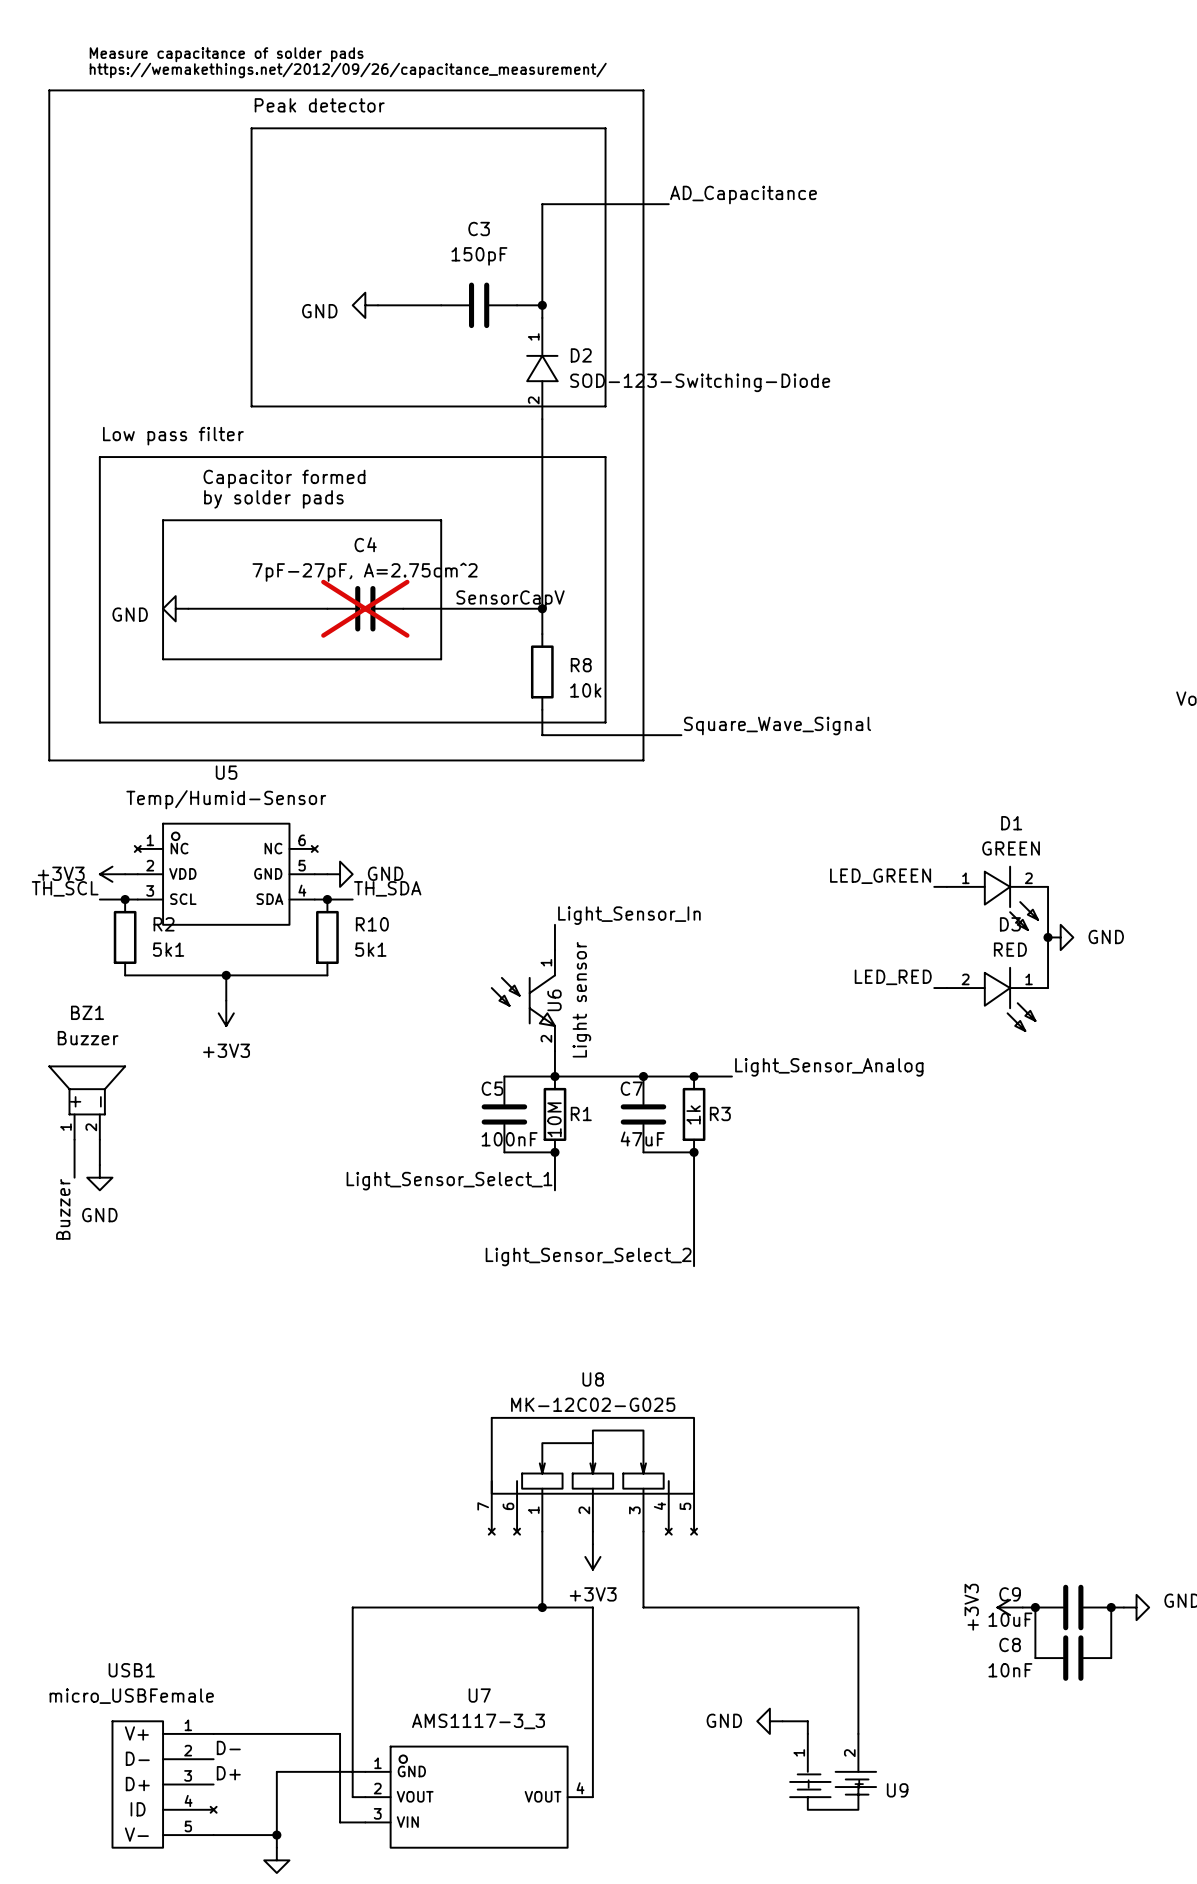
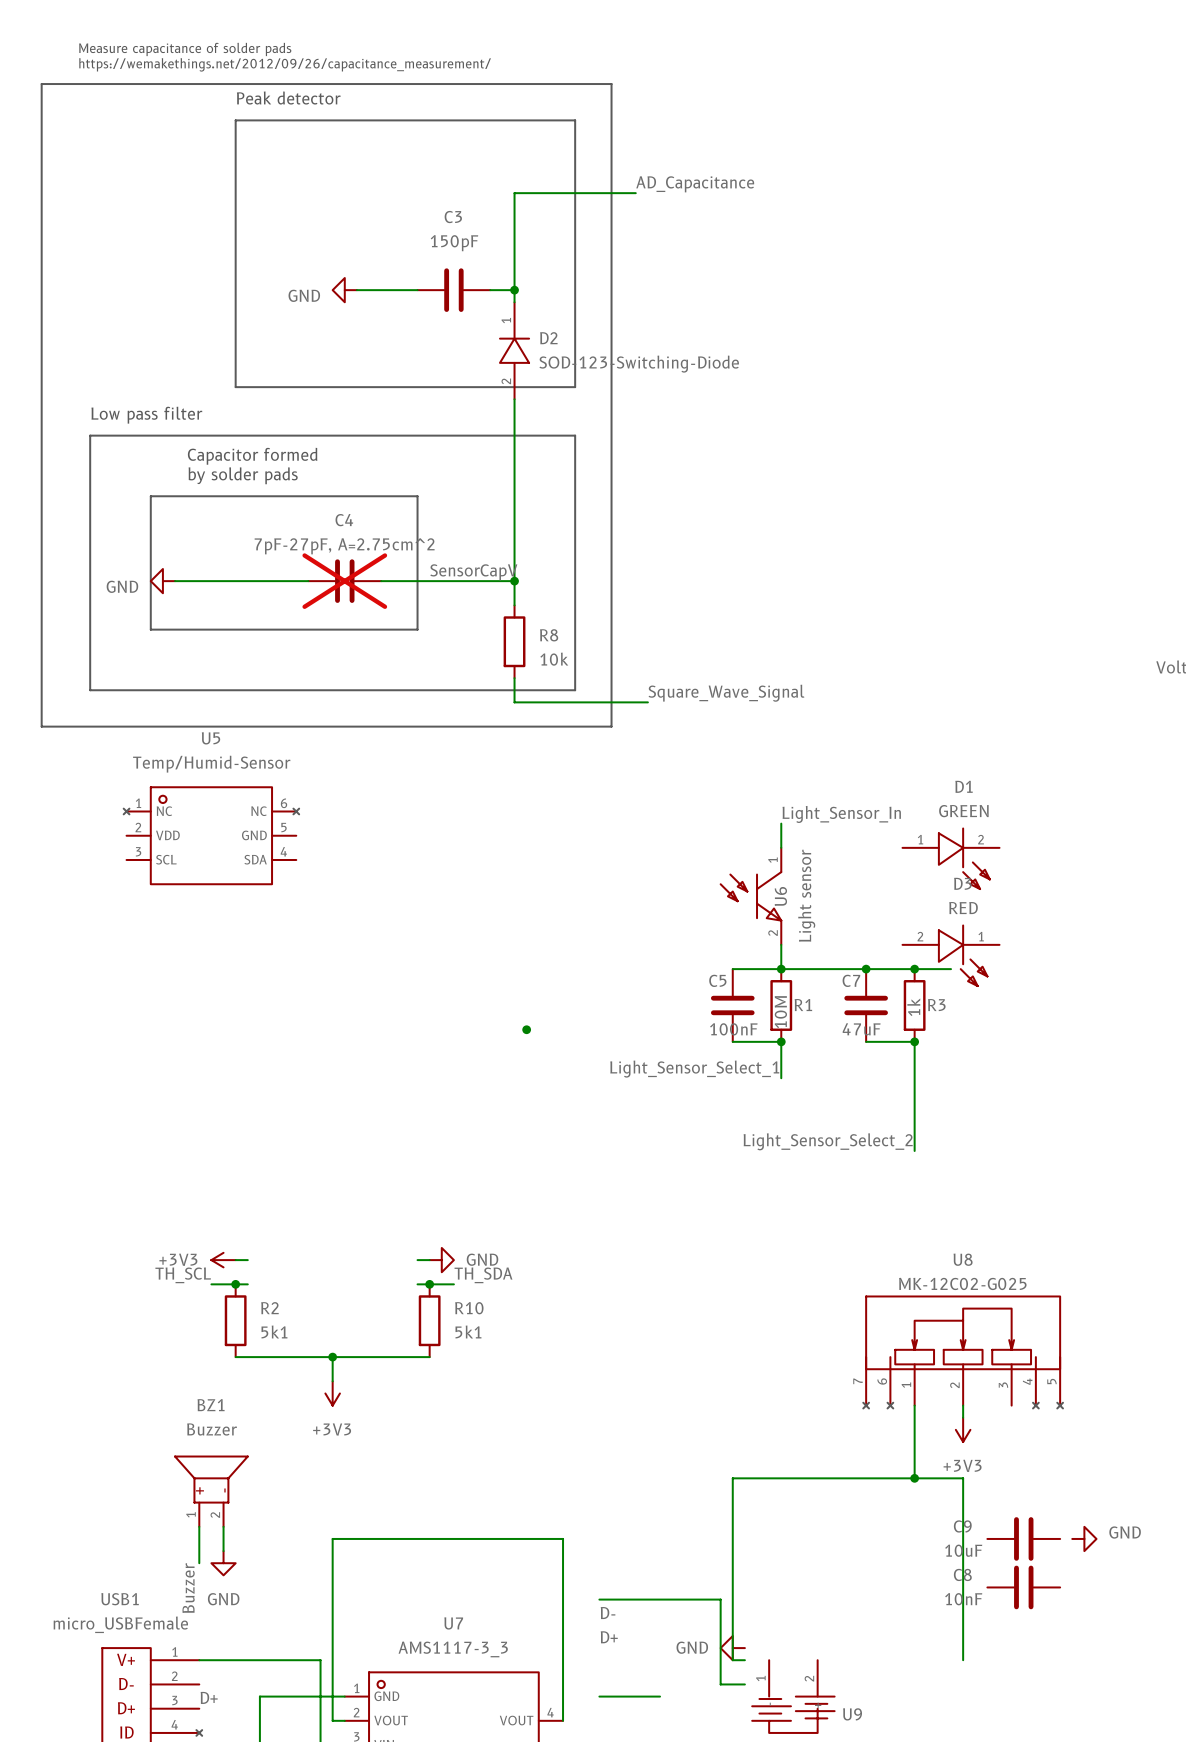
label: none -> Light_Sensor_In (841, 814)
wire: none -> (781, 823) (781, 847)
power symbol: +3V3 (112, 874) -> none
wire: (125, 874) (137, 874) -> none
wire: (314, 874) (327, 874) -> none
power symbol: GND (340, 874) -> none
label: LED_GREEN (880, 876) -> none
wire: (934, 886) (946, 886) -> none
wire: (1048, 886) (1048, 988) -> none
label: TH_SCL (65, 888) -> none
label: TH_SDA (387, 888) -> none
wire: (99, 899) (137, 899) -> none
junction: (125, 899) -> none
wire: (314, 899) (352, 899) -> none
junction: (327, 899) -> none
label: Light_Sensor_In (629, 915) -> none
wire: (554, 924) (554, 950) -> none
R2 position: (125, 937) -> (235, 1320)
R10 position: (327, 937) -> (429, 1320)
junction: (1048, 937) -> none
power symbol: GND (1060, 937) -> none
wire: (125, 975) (327, 975) -> none
wire: (226, 975) (226, 1000) -> none
junction: (226, 975) -> none
label: LED_RED (893, 977) -> none
wire: none -> (781, 944) (781, 969)
wire: (934, 988) (946, 988) -> none
U6 position: (523, 1000) -> (750, 896)
power symbol: +3V3 (226, 1013) -> none
wire: none -> (732, 969) (951, 969)
junction: none -> (781, 969)
junction: none -> (866, 969)
junction: none -> (914, 969)
wire: (554, 1051) (554, 1076) -> none
label: Light_Sensor_Analog (829, 1067) -> none
wire: (504, 1076) (731, 1076) -> none
junction: (643, 1076) -> none
junction: (694, 1076) -> none
wire: none -> (732, 1041) (781, 1041) (781, 1078)
junction: none -> (781, 1041)
wire: none -> (866, 1041) (914, 1041) (914, 1150)
junction: none -> (914, 1041)
BZ1 position: (87, 1103) -> (211, 1491)
C5 position: (504, 1114) -> (732, 1005)
R1 position: (554, 1114) -> (781, 1005)
C7 position: (643, 1114) -> (866, 1005)
R3 position: (694, 1114) -> (914, 1005)
label: none -> Light_Sensor_Select_1 (694, 1069)
wire: (74, 1139) (74, 1177) -> none
wire: (99, 1139) (99, 1165) -> none
wire: (504, 1152) (554, 1152) (554, 1190) -> none
junction: (554, 1152) -> none
wire: (643, 1152) (694, 1152) (694, 1266) -> none
junction: (694, 1152) -> none
power symbol: GND (99, 1177) -> none
label: Light_Sensor_Select_1 (449, 1181) -> none
label: none -> Light_Sensor_Select_2 (828, 1141)
label: Buzzer (63, 1209) -> none
label: Light_Sensor_Select_2 (588, 1256) -> none
power symbol: none -> +3V3 (223, 1260)
wire: none -> (235, 1260) (247, 1260)
wire: none -> (417, 1260) (429, 1260)
power symbol: none -> GND (441, 1260)
label: none -> TH_SCL (183, 1275)
label: none -> TH_SDA (483, 1275)
wire: none -> (211, 1284) (247, 1284)
junction: none -> (235, 1284)
wire: none -> (417, 1284) (453, 1284)
junction: none -> (429, 1284)
wire: none -> (235, 1357) (429, 1357)
wire: none -> (332, 1357) (332, 1381)
junction: none -> (332, 1357)
power symbol: none -> +3V3 (332, 1393)
wire: none -> (914, 1405) (914, 1478)
wire: none -> (963, 1405) (963, 1417)
U8 position: (592, 1476) -> (963, 1352)
wire: (542, 1531) (542, 1607) -> none
wire: (592, 1531) (592, 1544) -> none
wire: (643, 1531) (643, 1607) (858, 1607) (858, 1733) -> none
junction: none -> (914, 1478)
power symbol: +3V3 (592, 1556) -> none
wire: none -> (199, 1526) (199, 1563)
wire: none -> (223, 1526) (223, 1551)
junction: (542, 1607) -> none
power symbol rotation: 0° (1010, 1607) -> 90° counterclockwise (963, 1429)
power symbol position: +3V3 (1010, 1607) -> +3V3 (963, 1429)
wire: (1022, 1607) (1035, 1607) (1035, 1658) -> none
junction: (1035, 1607) -> none
junction: (1111, 1607) -> none
wire: (1123, 1607) (1111, 1607) (1111, 1658) -> none
power symbol: none -> GND (223, 1563)
label: none -> Buzzer (188, 1588)
wire: none -> (599, 1599) (720, 1599) (720, 1684) (744, 1684)
label: none -> D- (608, 1613)
label: none -> D+ (609, 1637)
wire: (782, 1721) (807, 1721) (807, 1733) -> none
wire: none -> (744, 1660) (732, 1660) (732, 1478) (963, 1478) (963, 1660)
label: D- (228, 1747) -> none
wire: none -> (599, 1696) (660, 1696)

